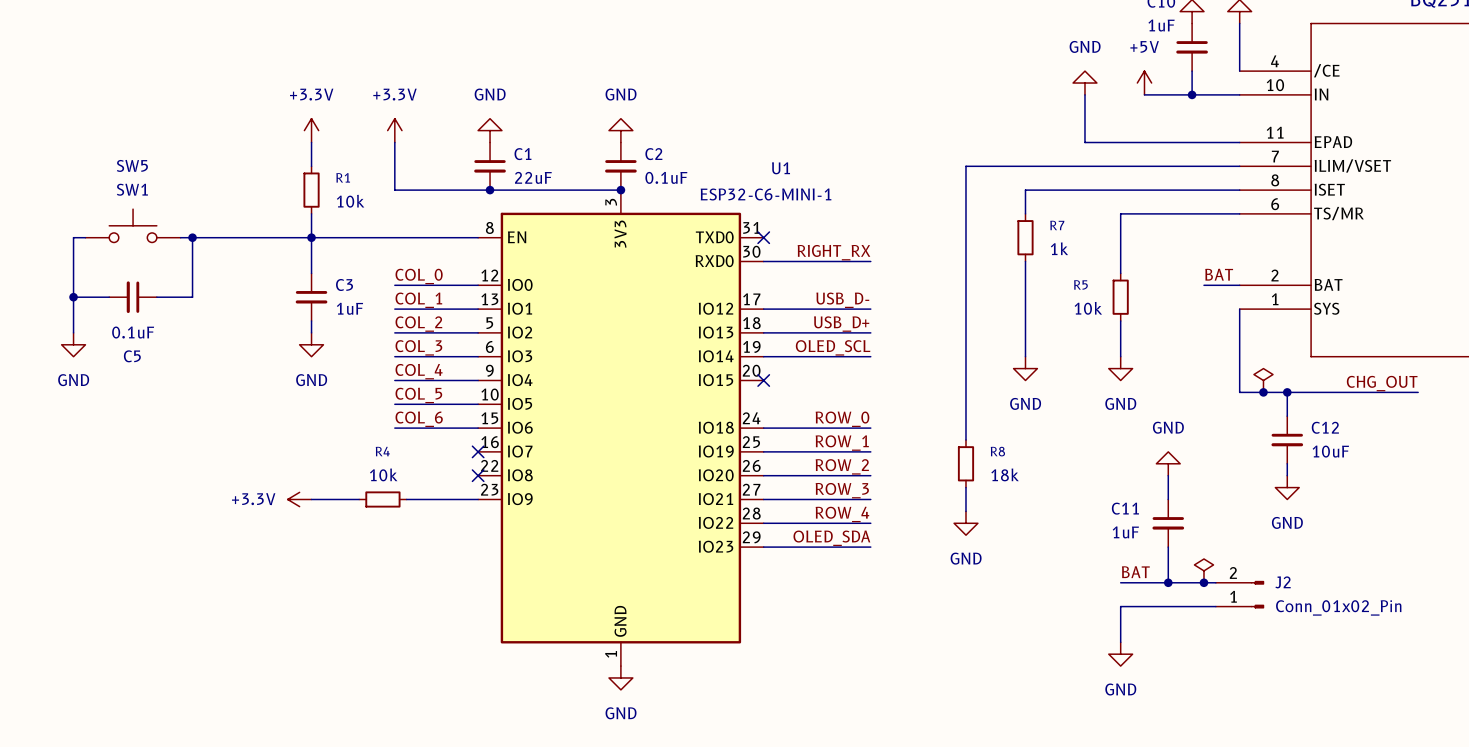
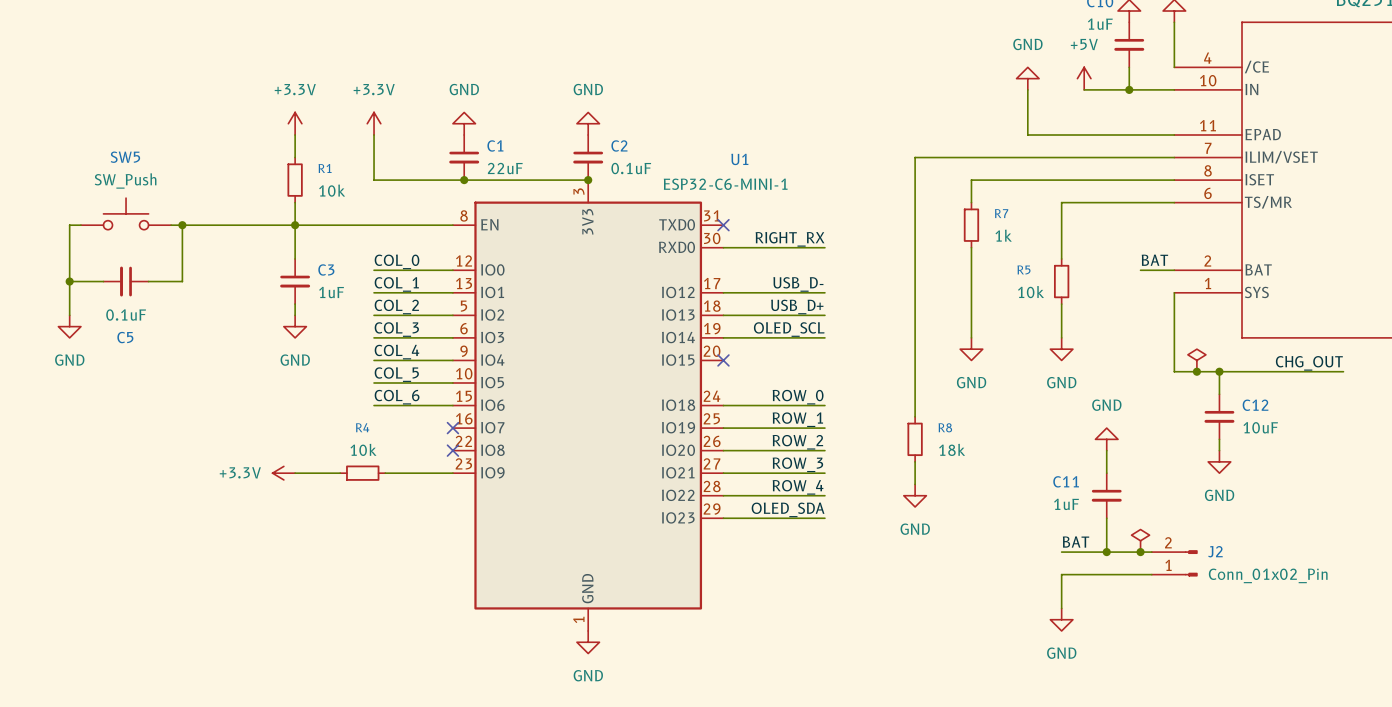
SW1 value: SW5 (132, 165) -> SW_Push (125, 180)
SW1 name: SW1 (132, 189) -> SW5 (125, 157)

